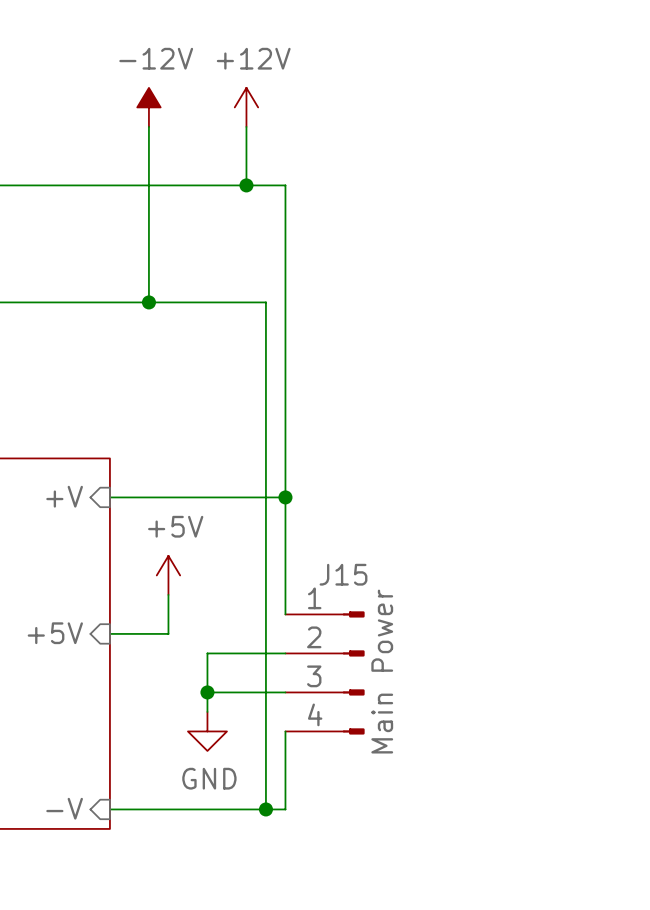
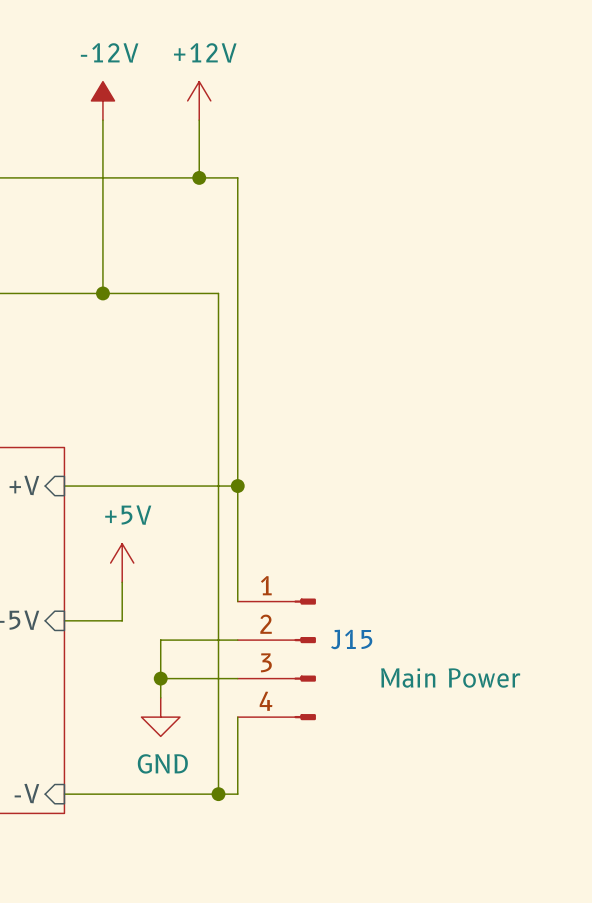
J15 name position: J15 (343, 574) -> J15 (351, 639)
J15 value rotation: 0° (382, 671) -> 90° clockwise (450, 677)

